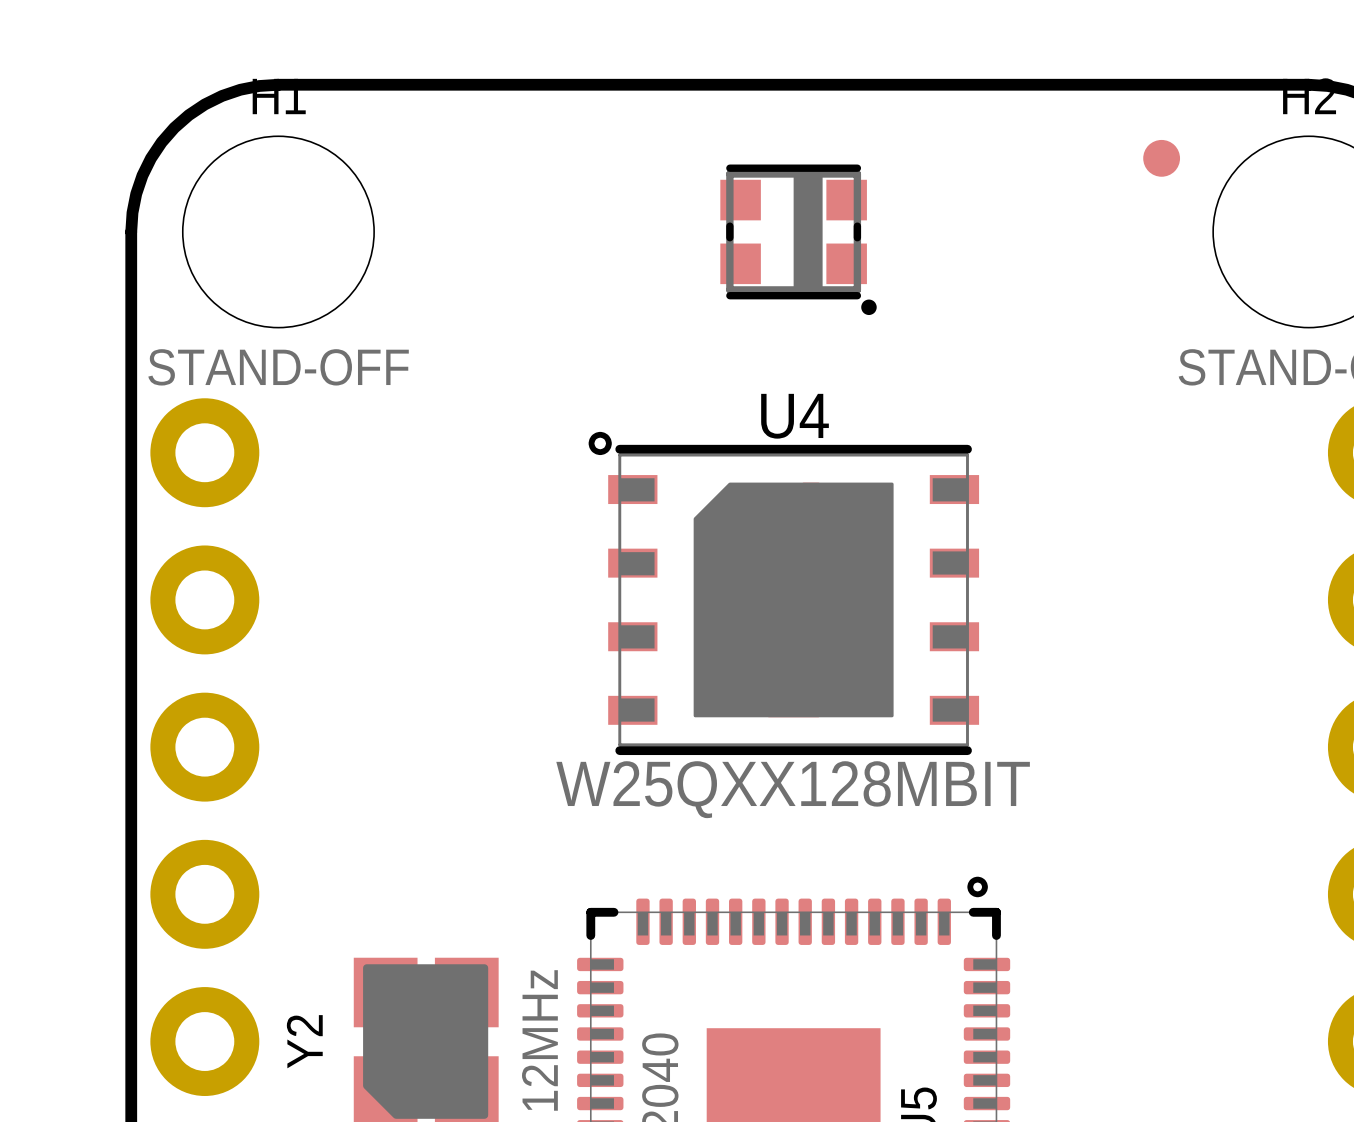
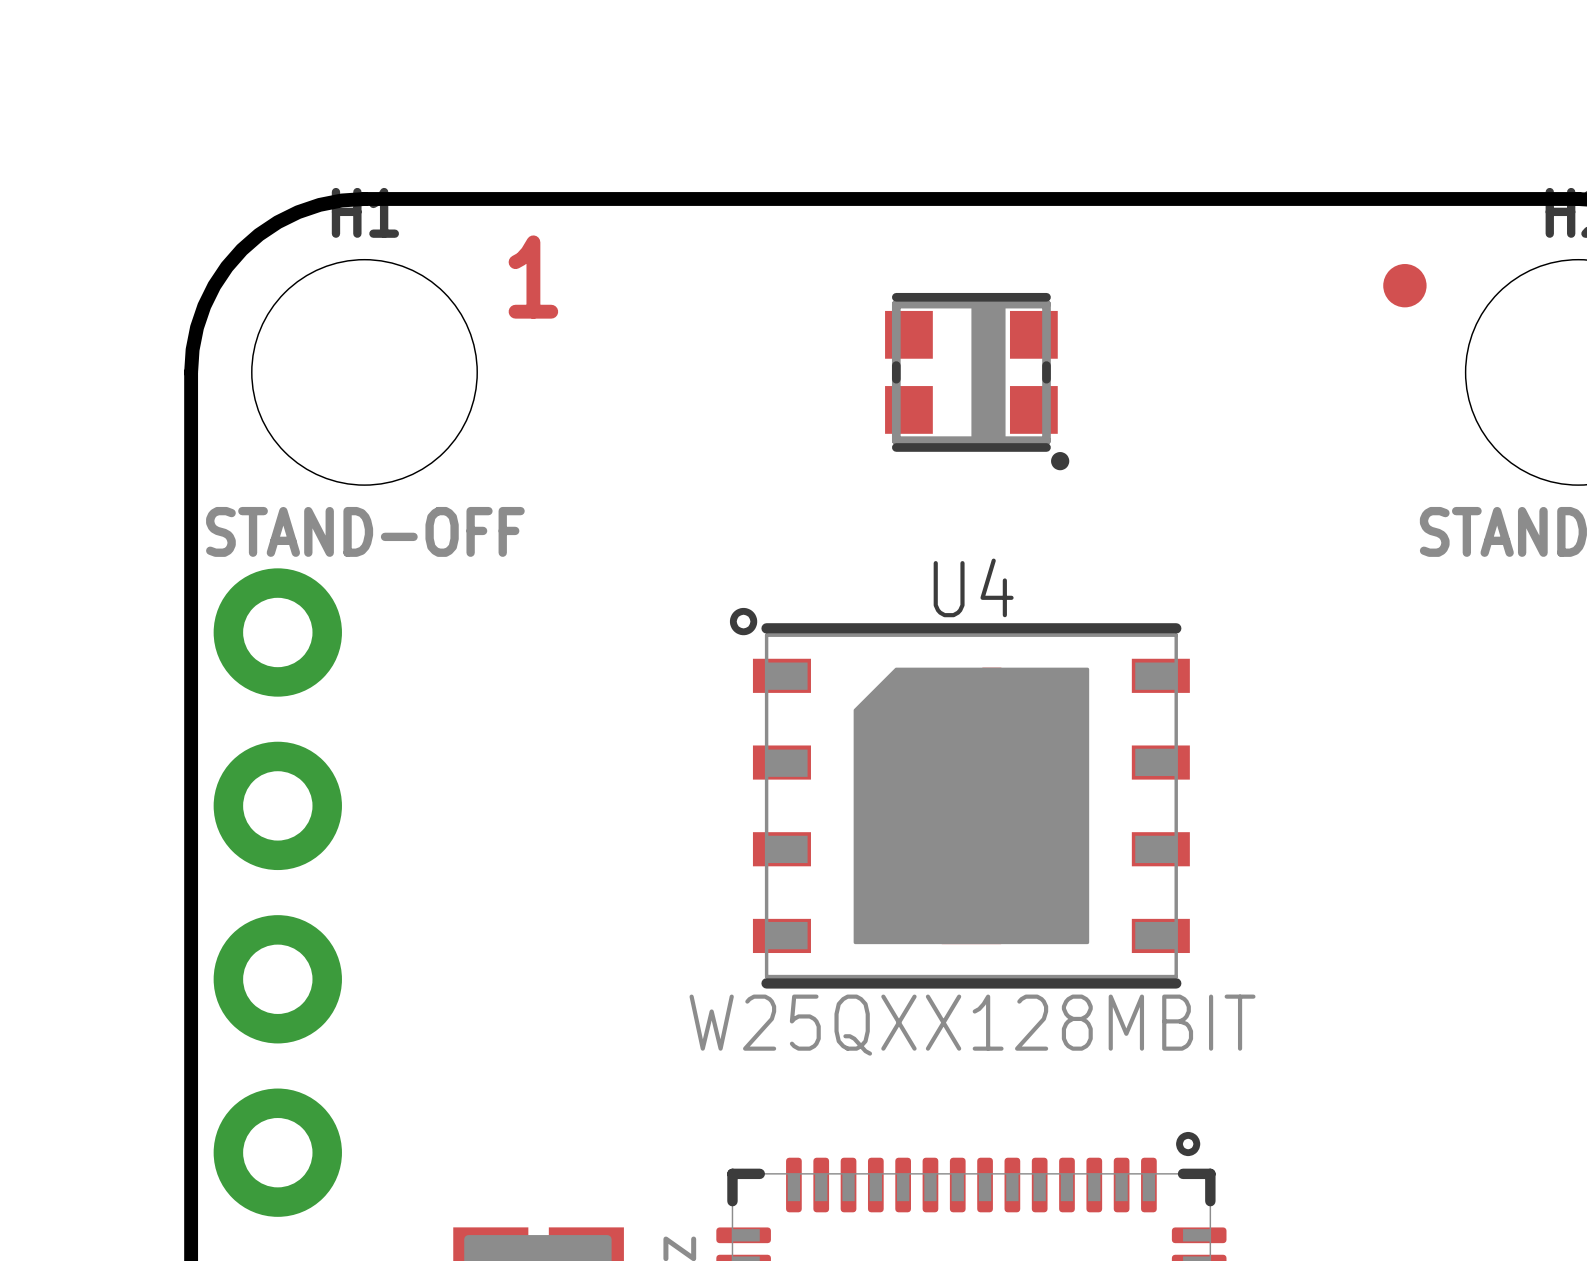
text: none -> 1 (533, 277)

